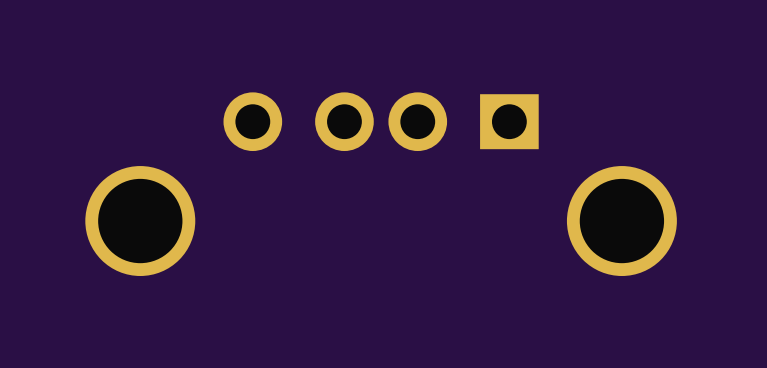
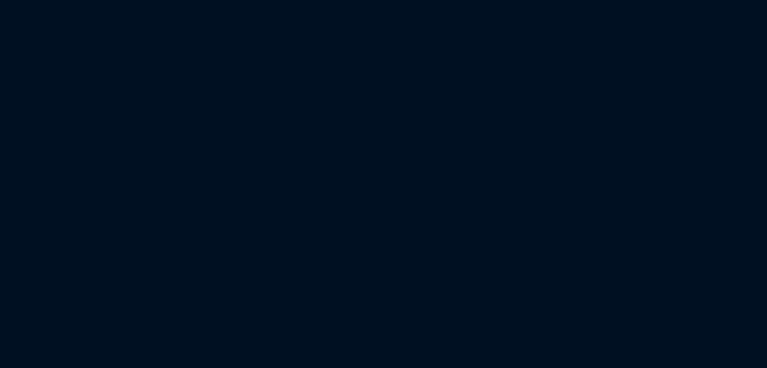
part: (381, 184) -> none

